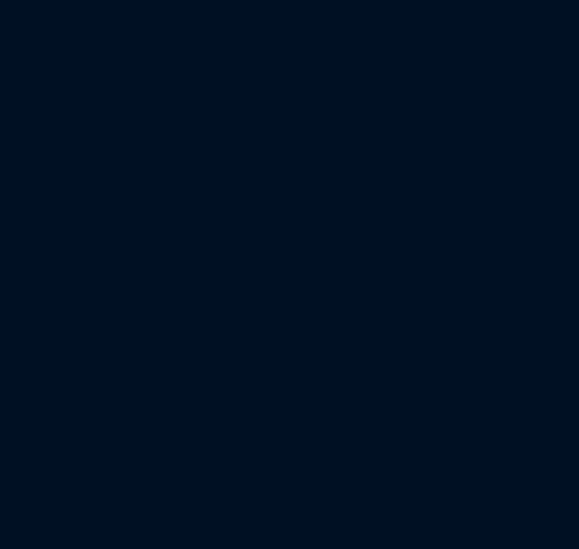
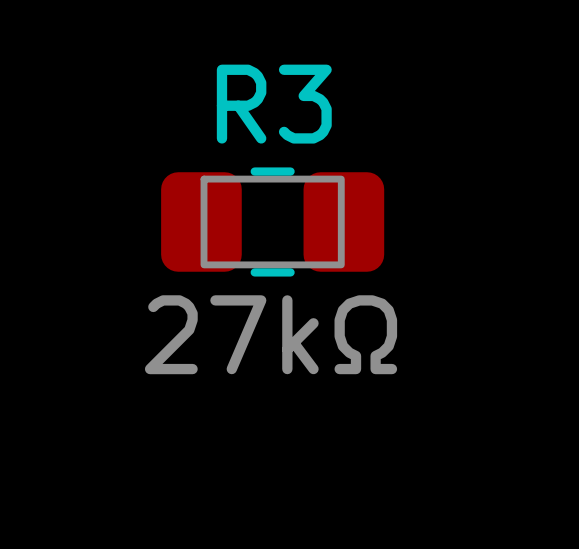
R3: none -> 27kΩ (272, 221)

